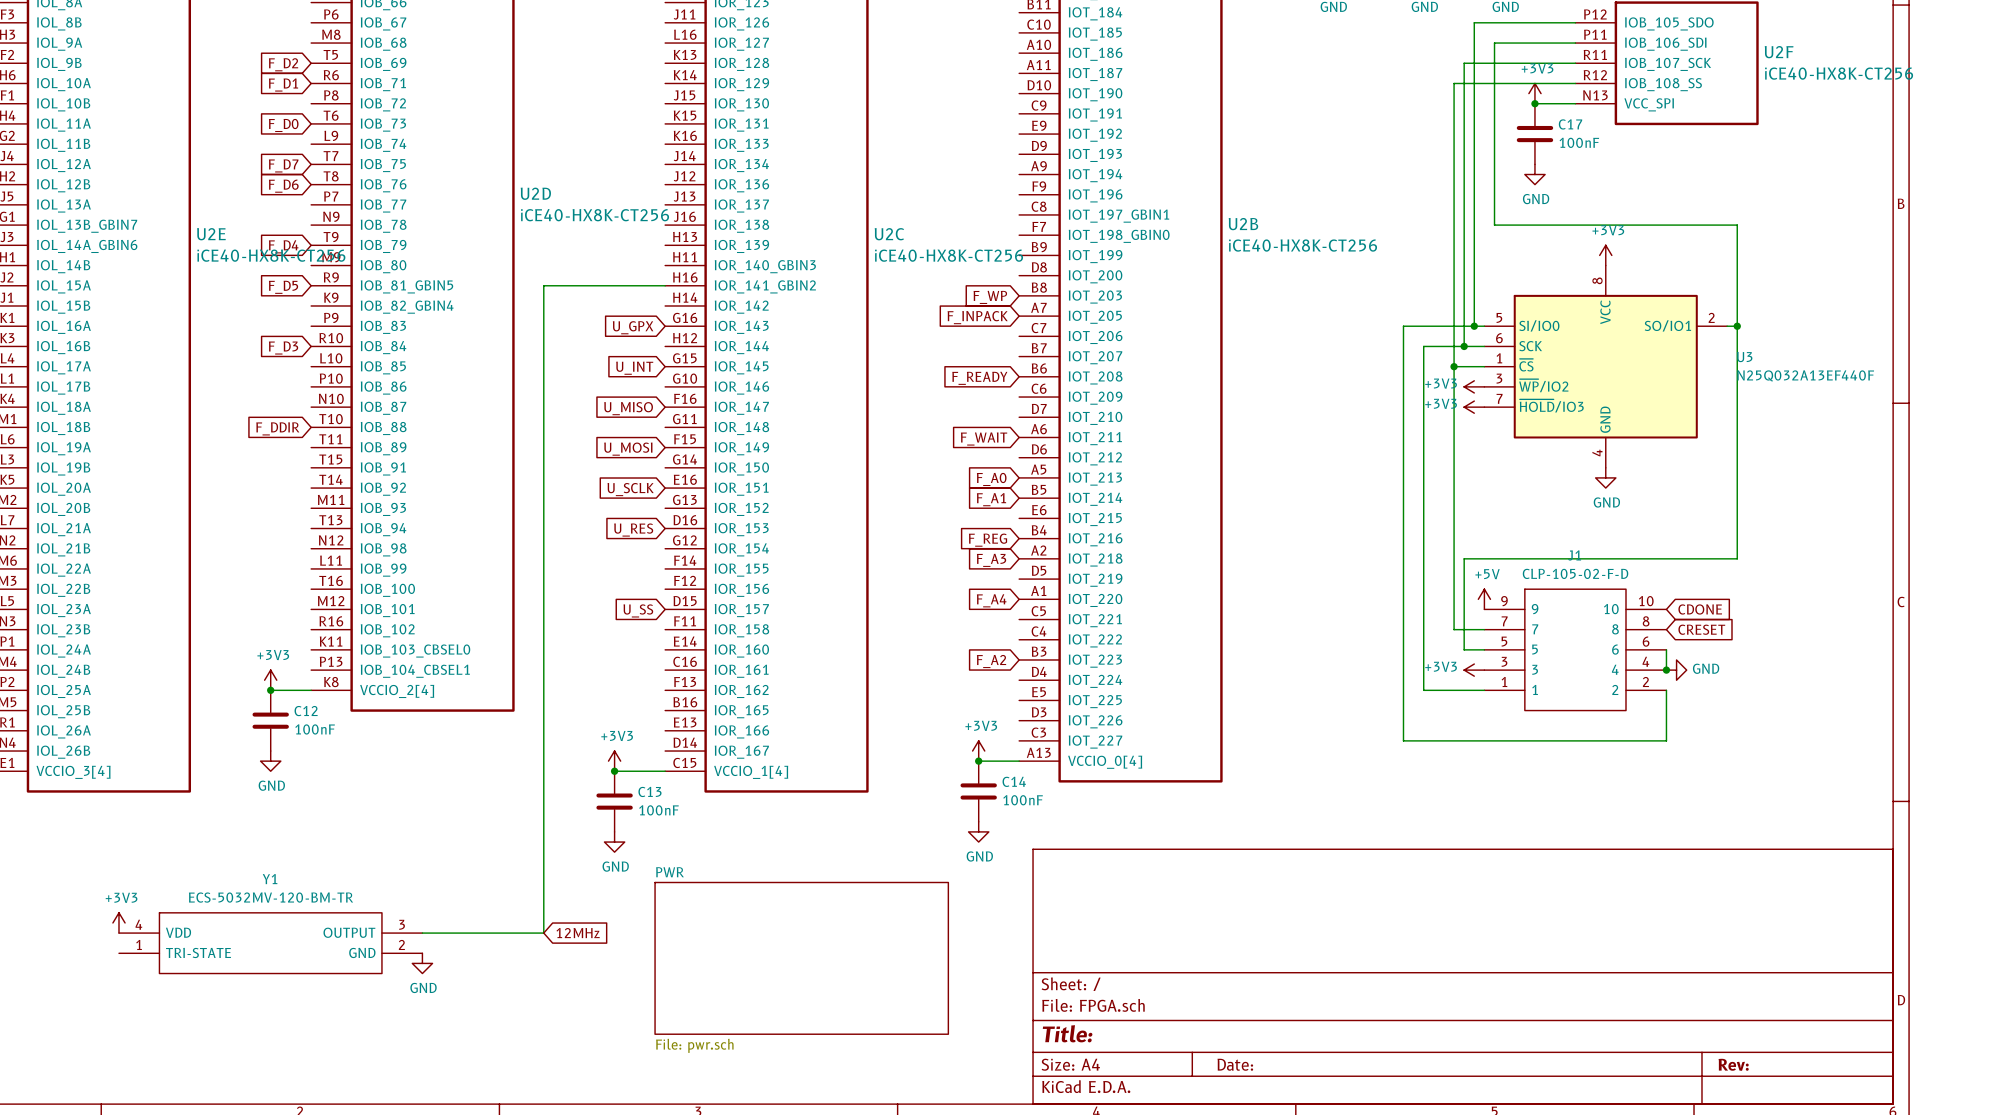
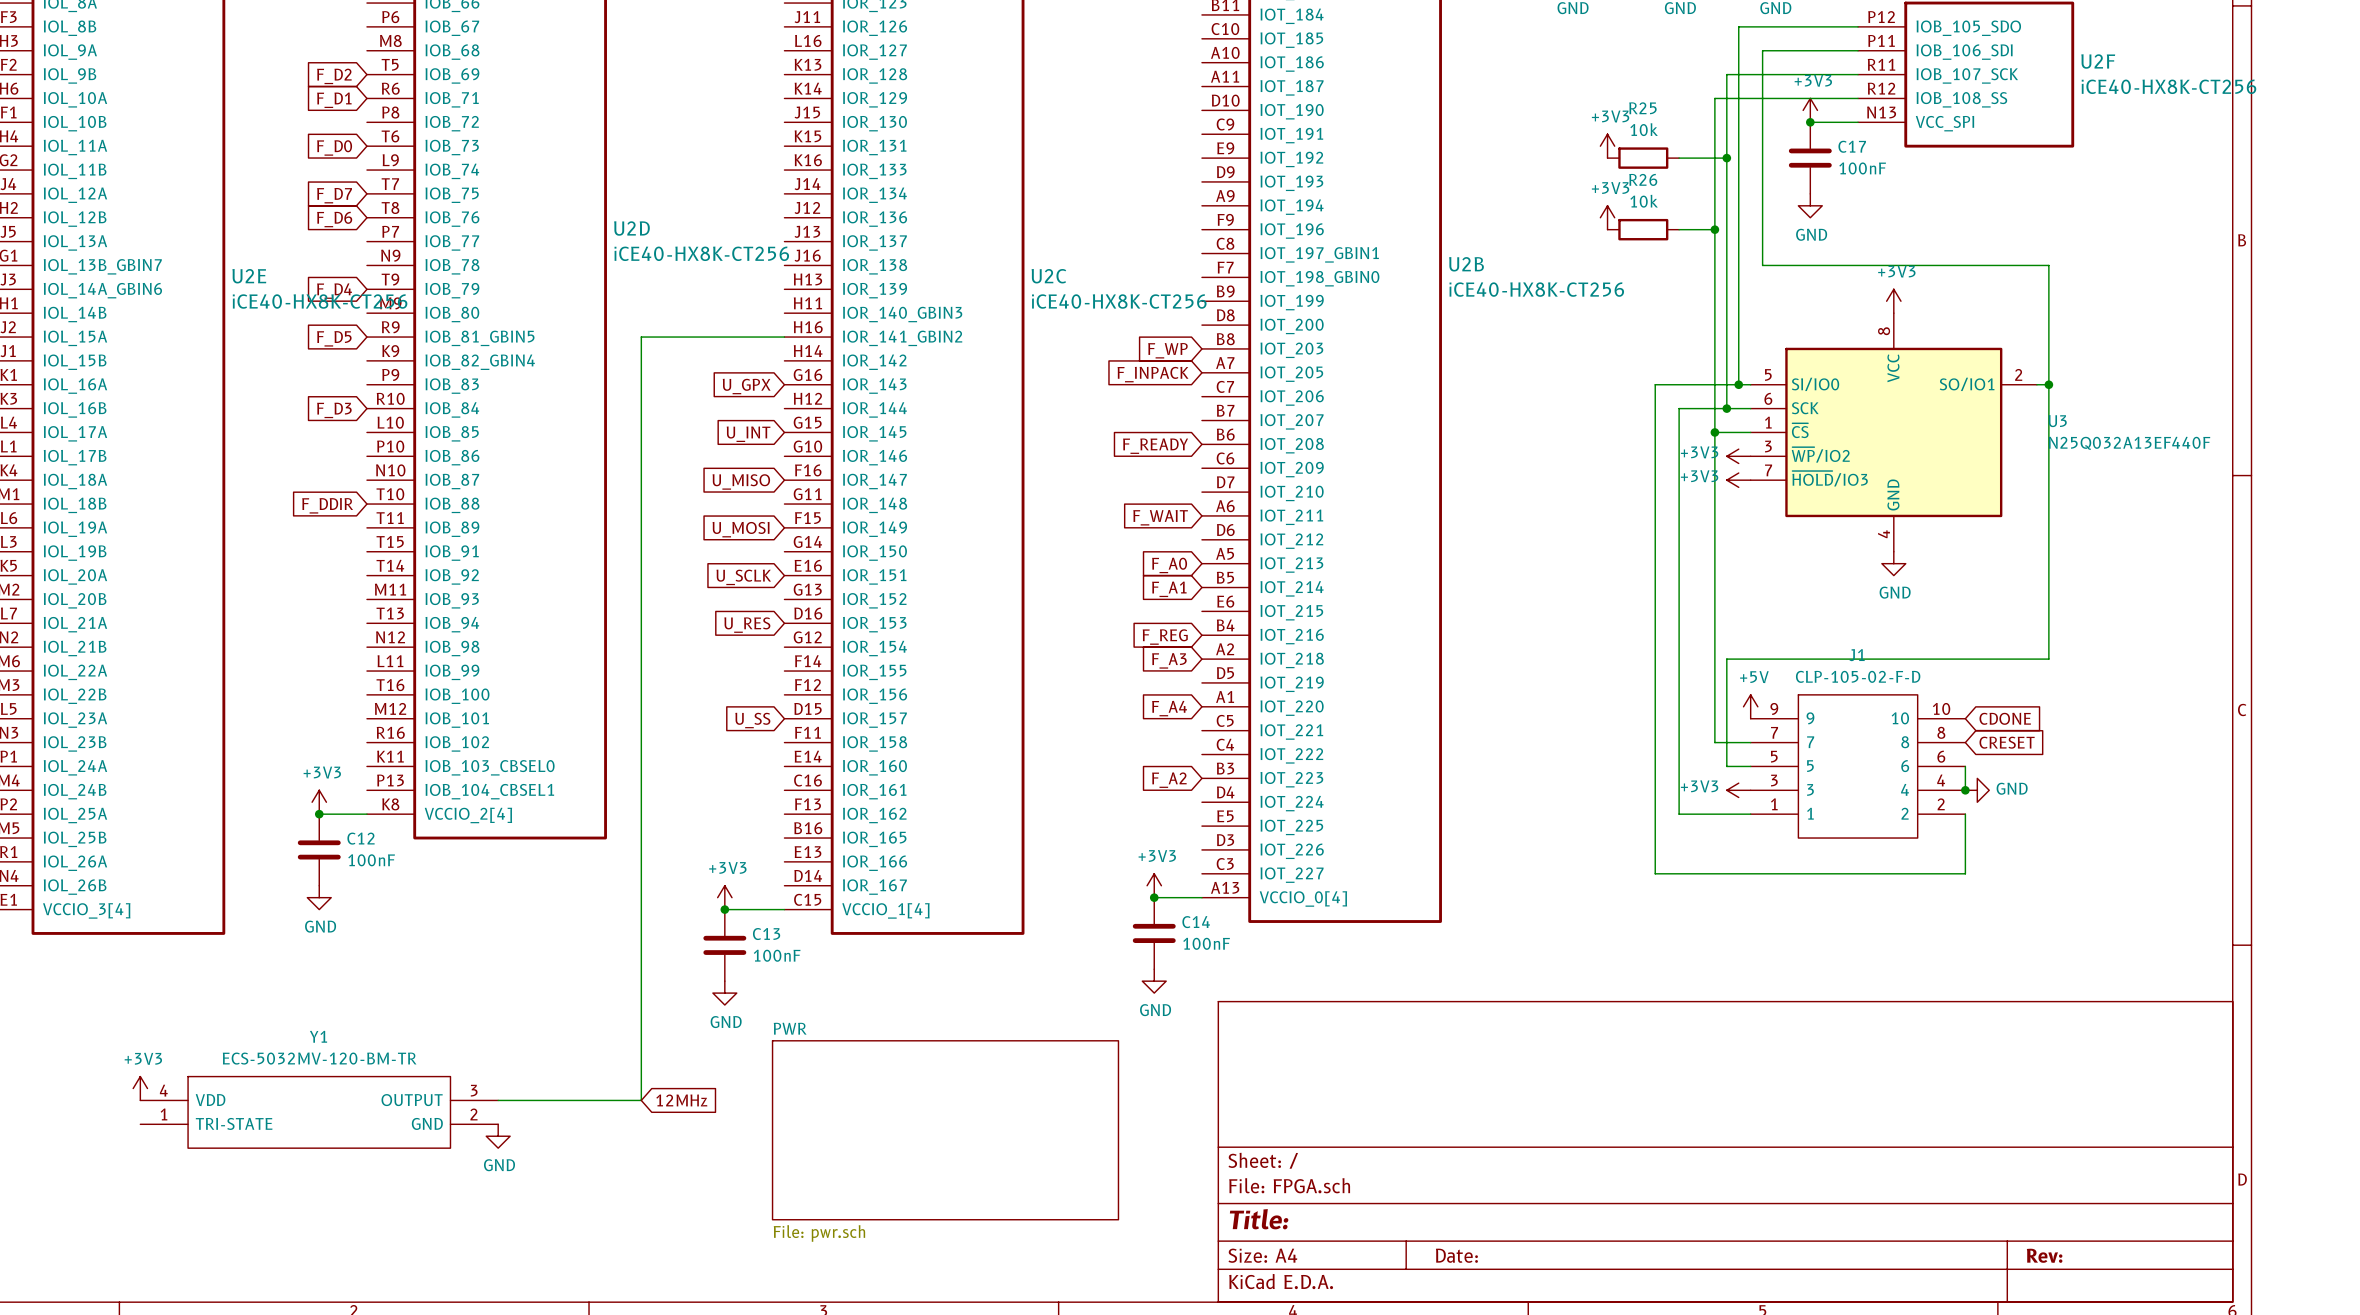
power symbol: none -> +3V3 (1607, 146)
R25: none -> 10k (1643, 158)
wire: none -> (1679, 158) (1726, 158)
junction: none -> (1726, 158)
power symbol: none -> +3V3 (1607, 217)
R26: none -> 10k (1643, 229)
wire: none -> (1679, 229) (1714, 229)
junction: none -> (1714, 229)

